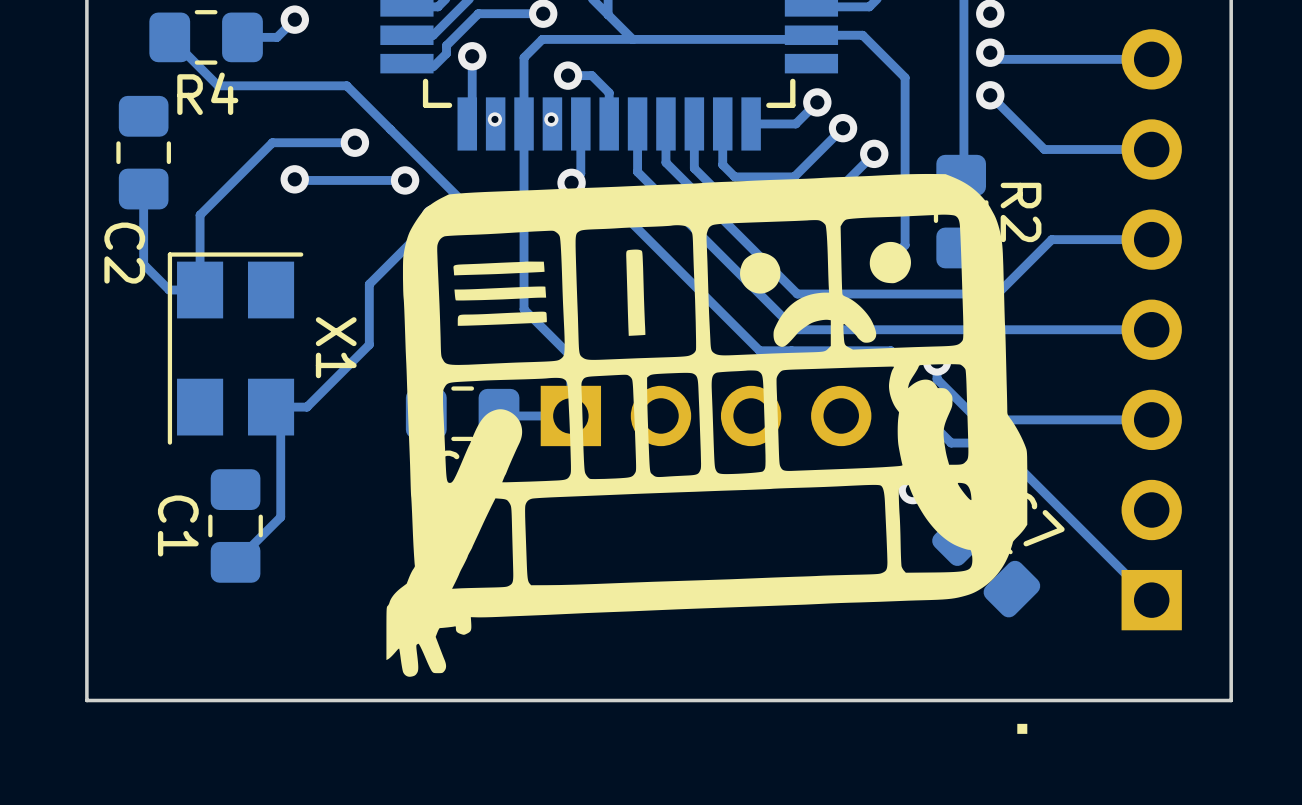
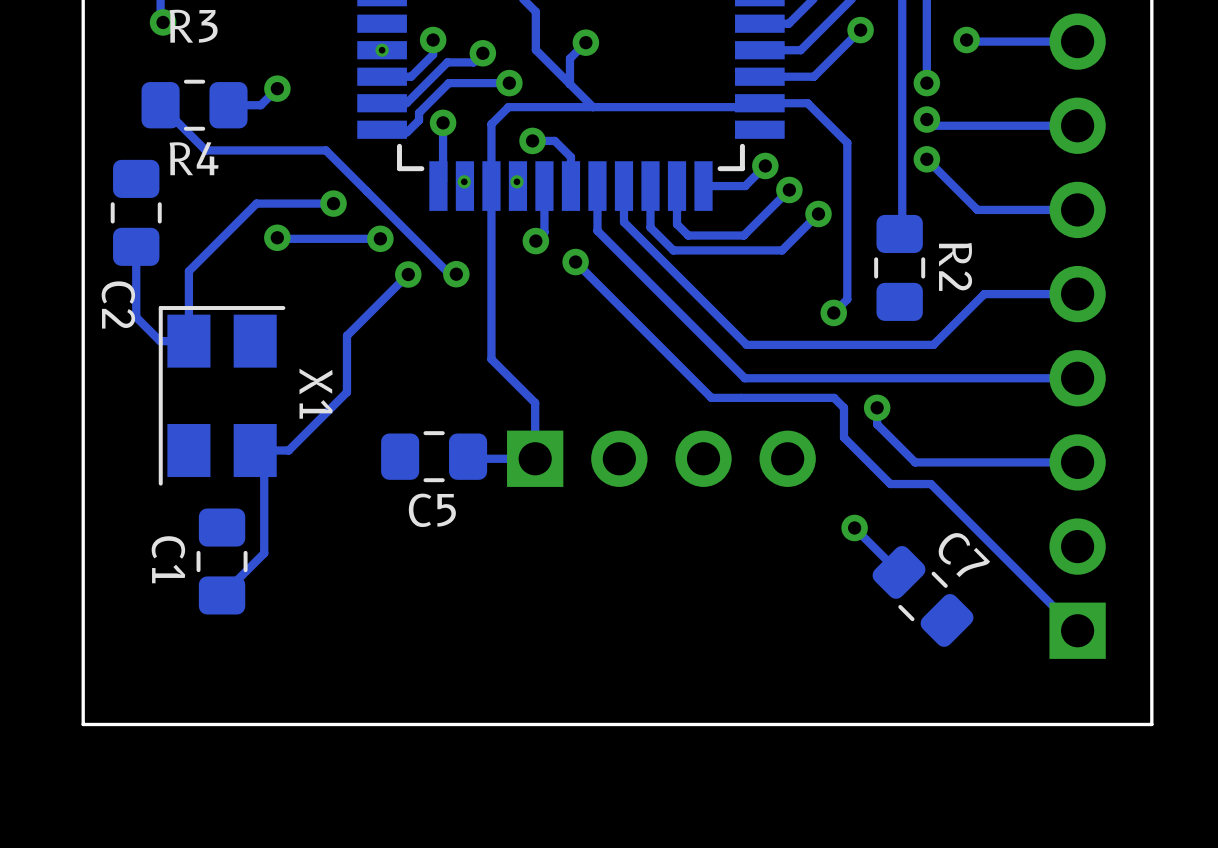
drawing: [386, 173, 1028, 677] -> none
drawing: [1017, 723, 1028, 734] -> none

